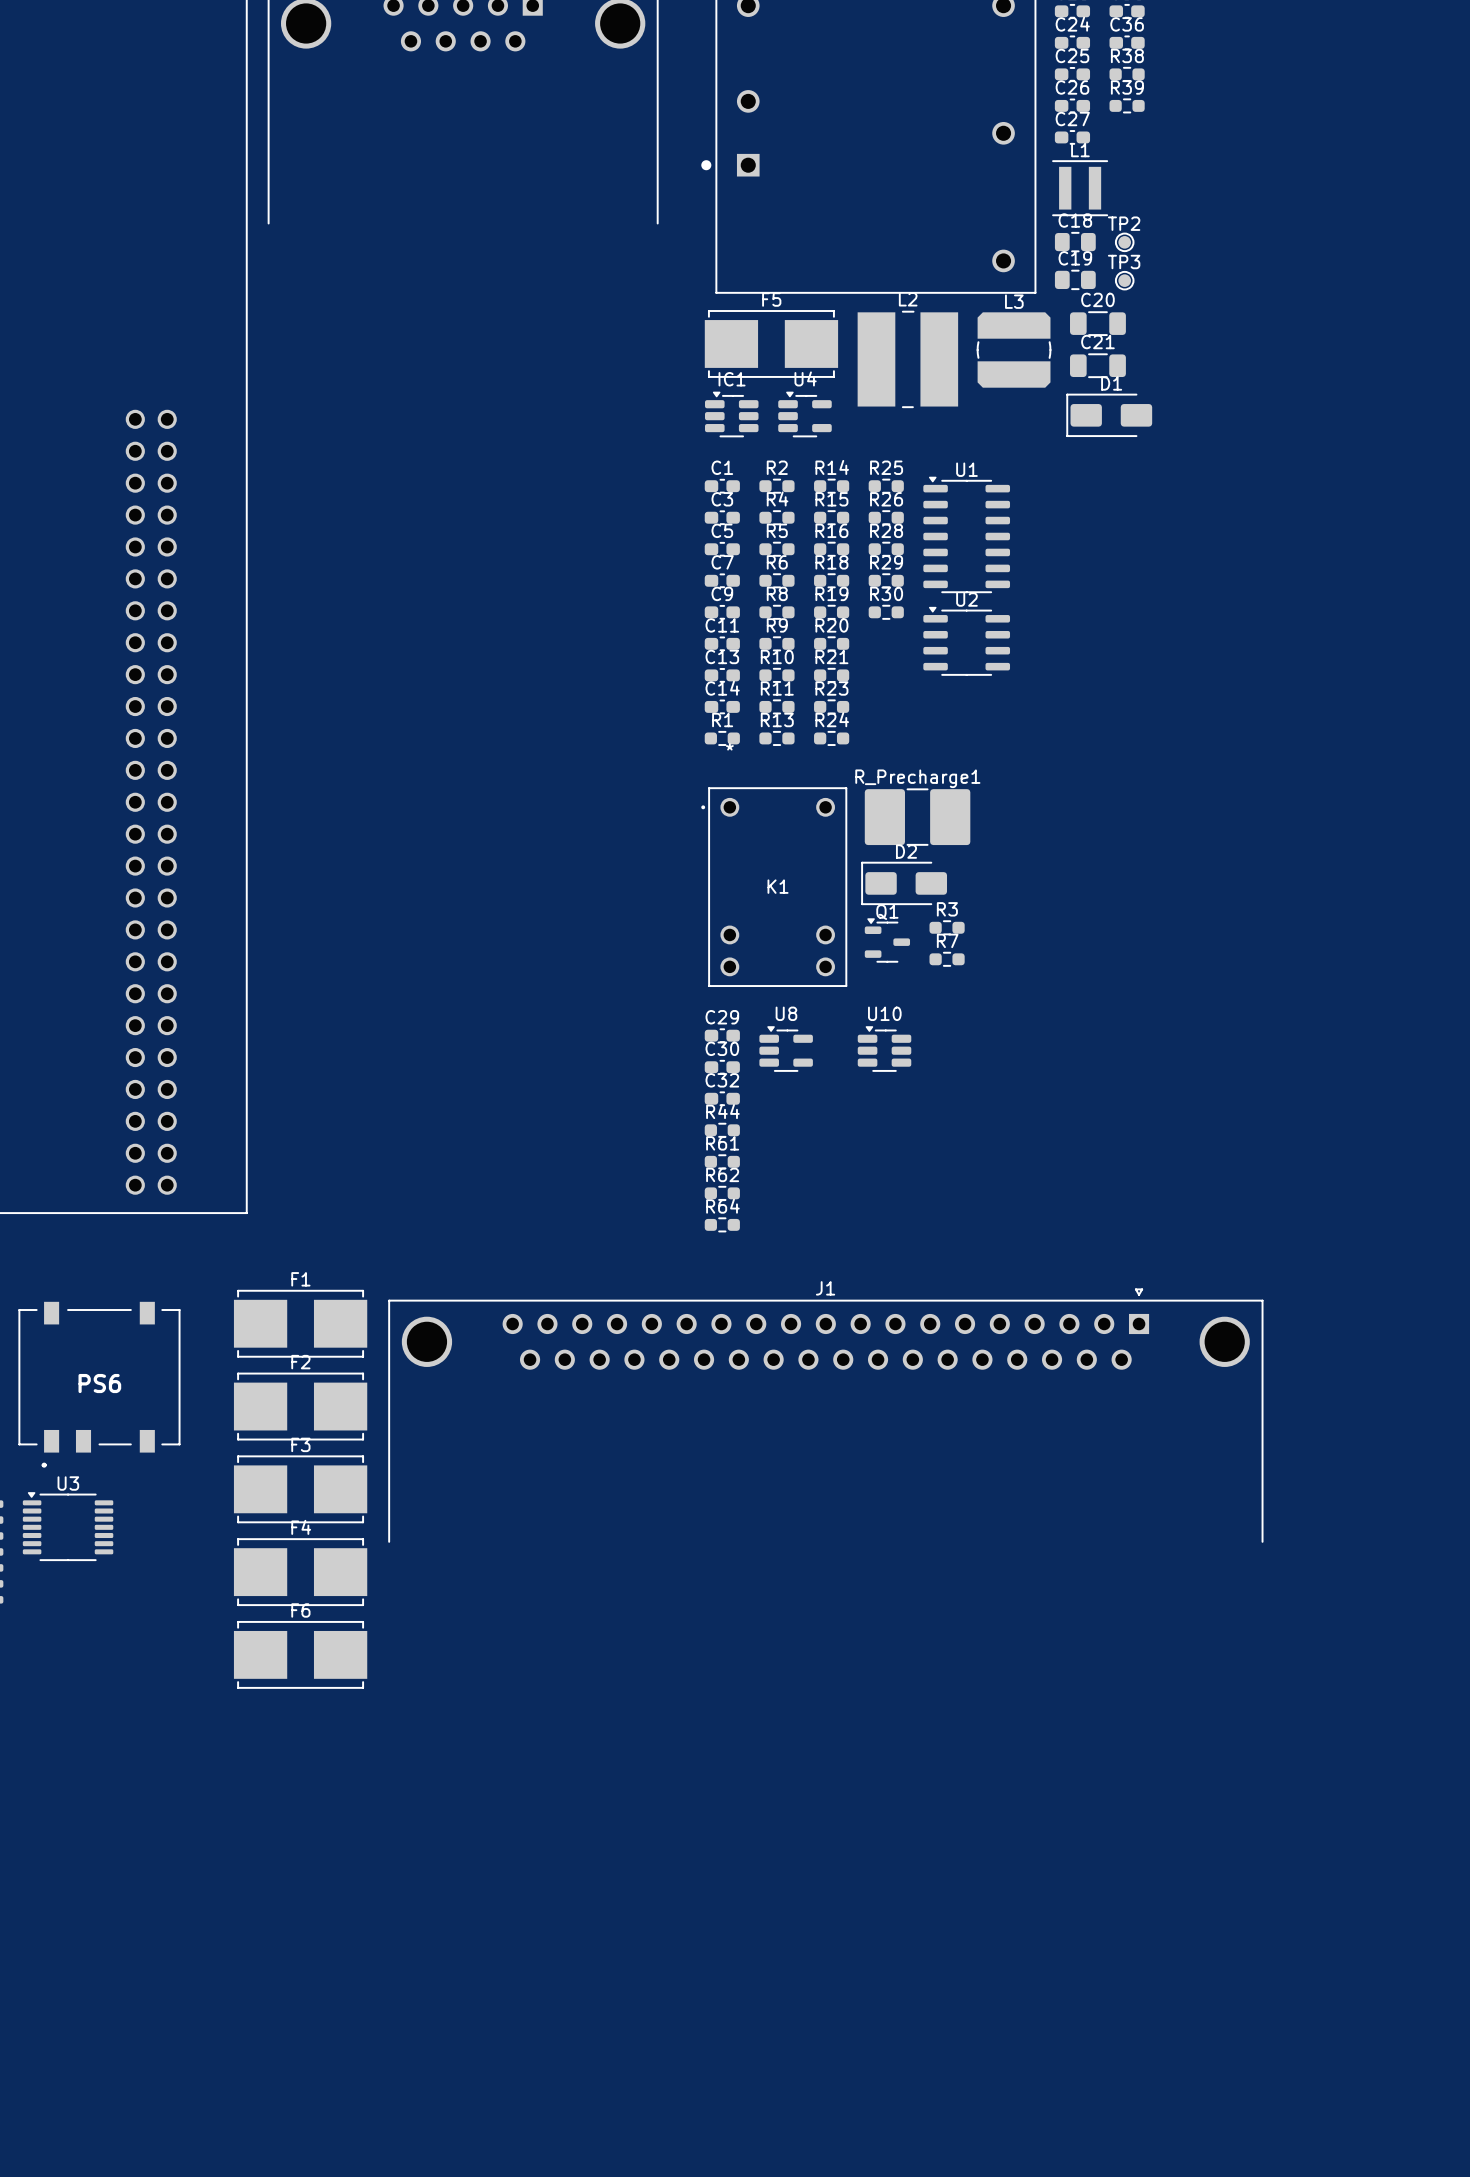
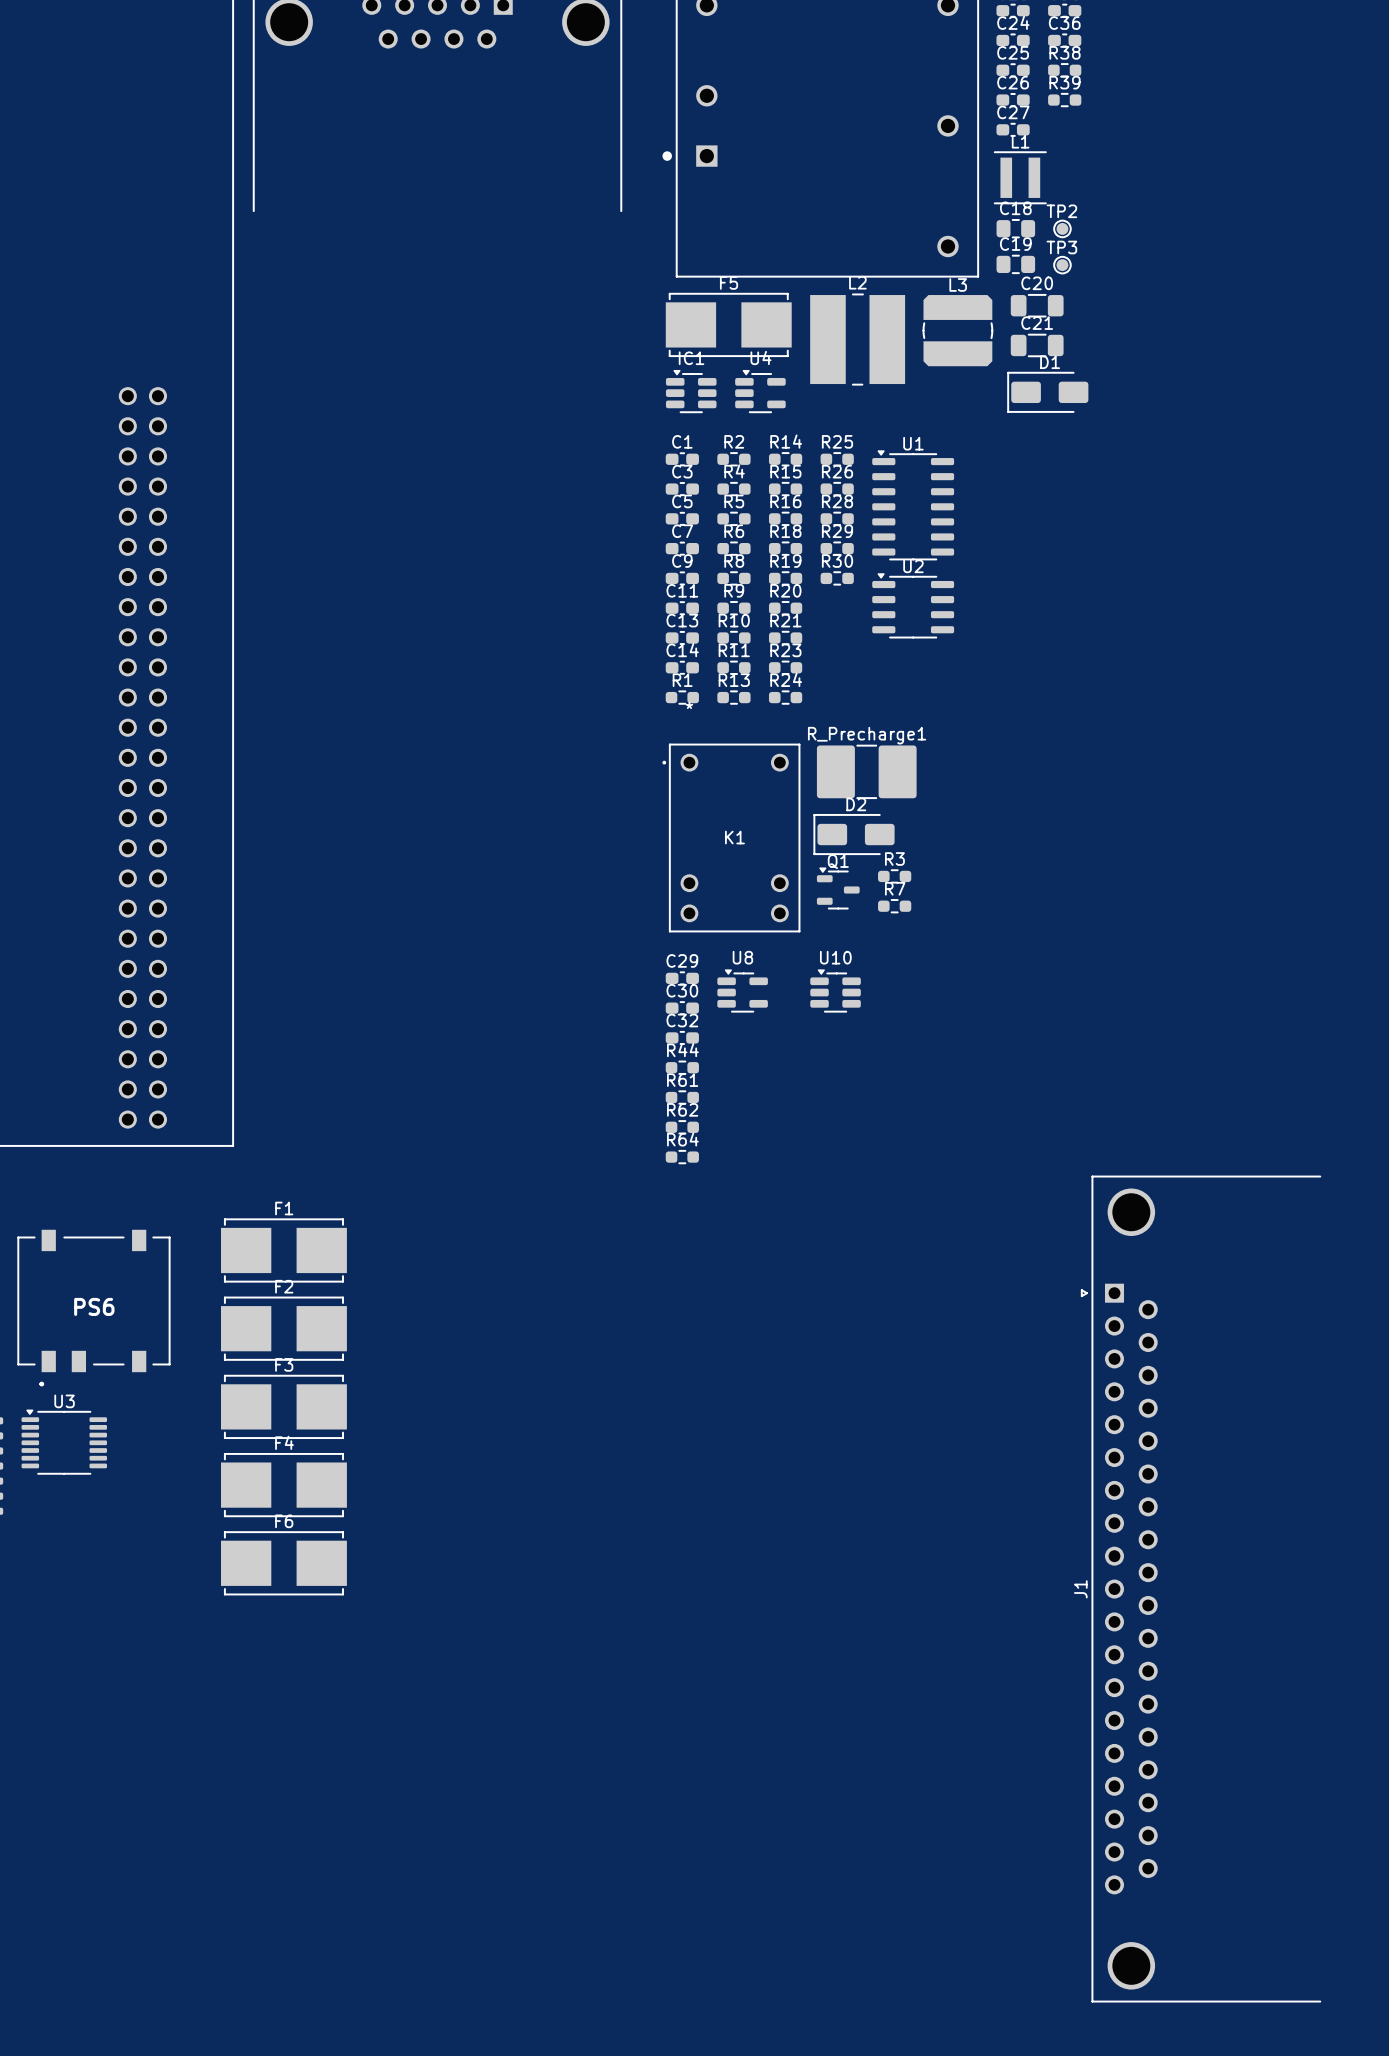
J1 rotation: 0° (825, 1415) -> 90° counterclockwise (1201, 1589)

